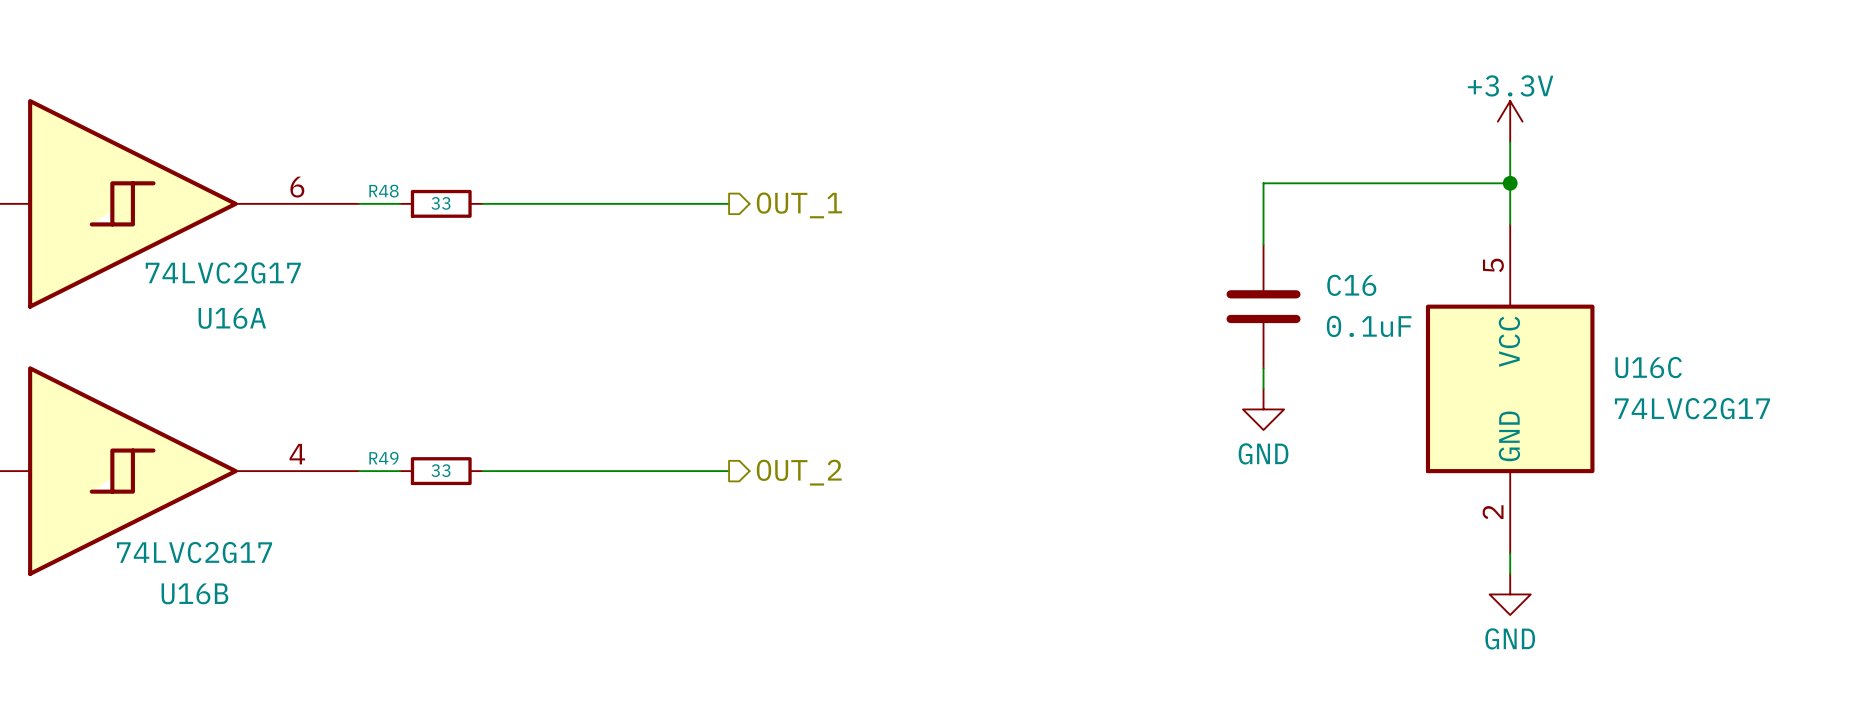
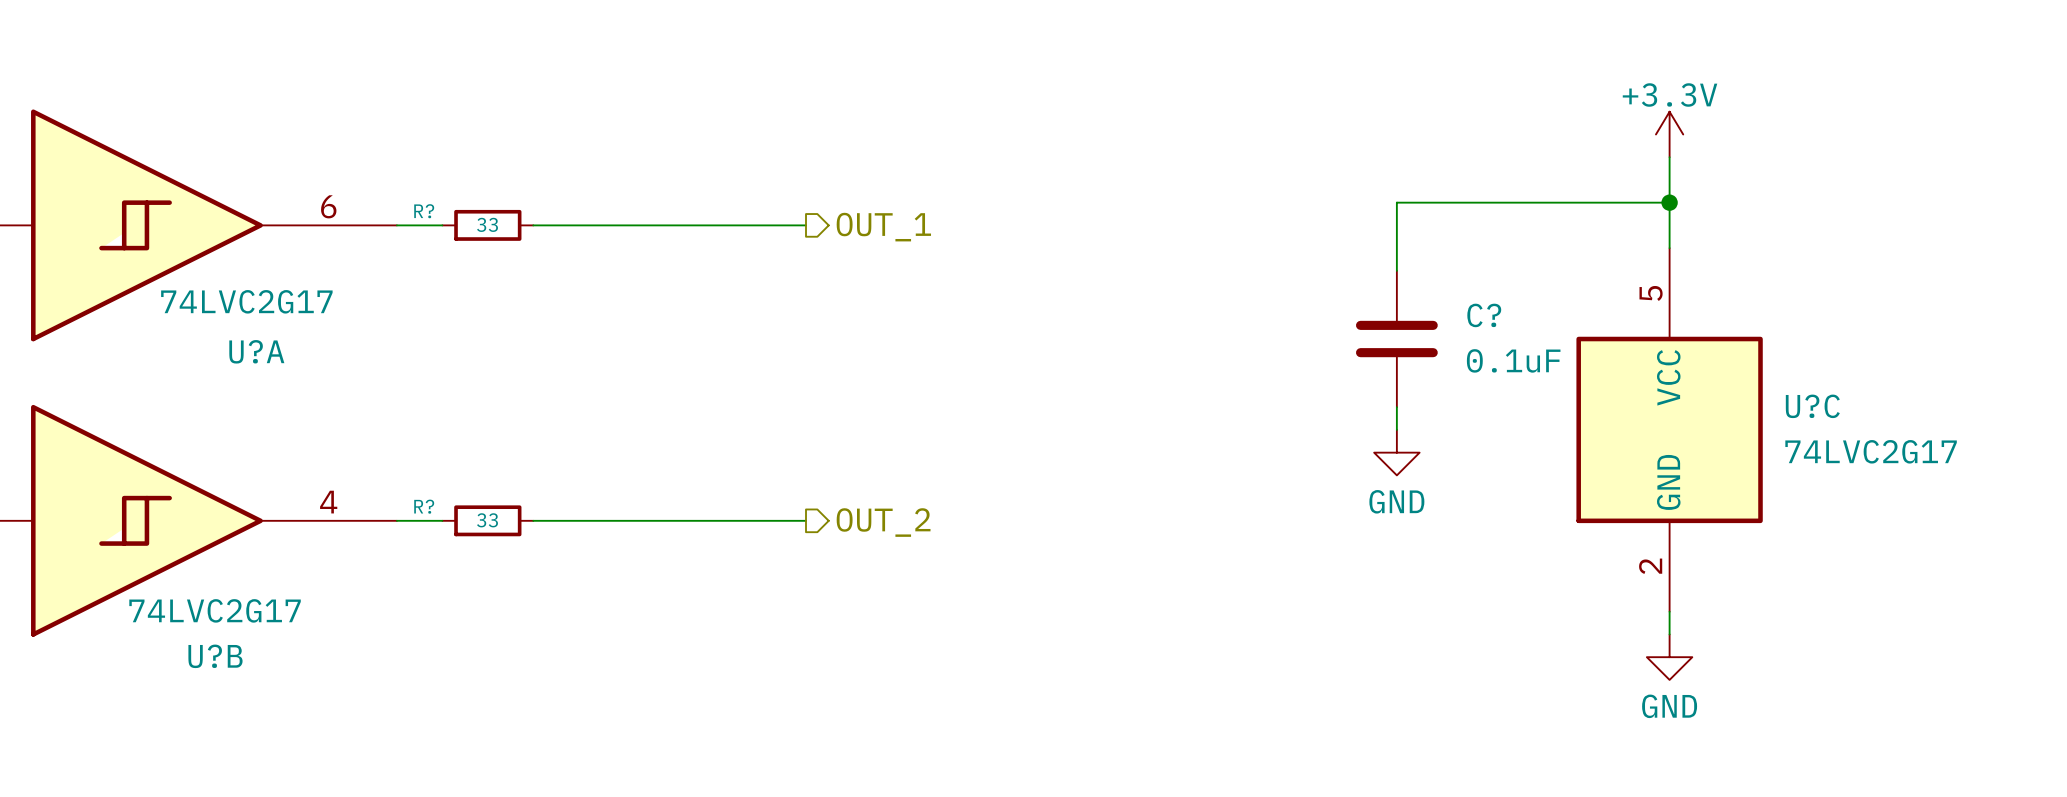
R48 name: R48 (384, 191) -> R? (424, 211)
C16 name: C16 (1351, 285) -> C? (1484, 315)
U16A name: U16A (232, 318) -> U?A (256, 351)
U16C name: U16C (1648, 367) -> U?C (1812, 406)
R49 name: R49 (383, 458) -> R? (424, 506)
U16B name: U16B (194, 593) -> U?B (215, 656)

